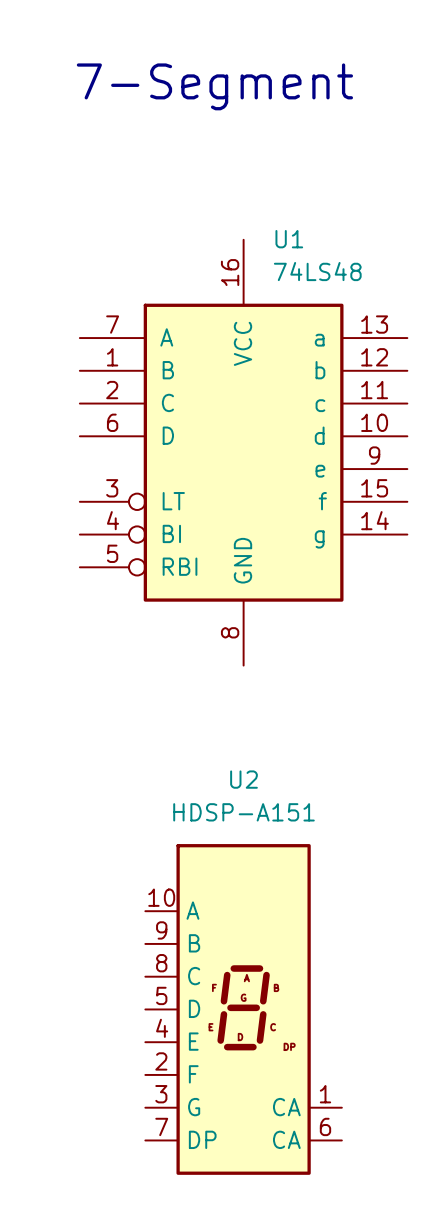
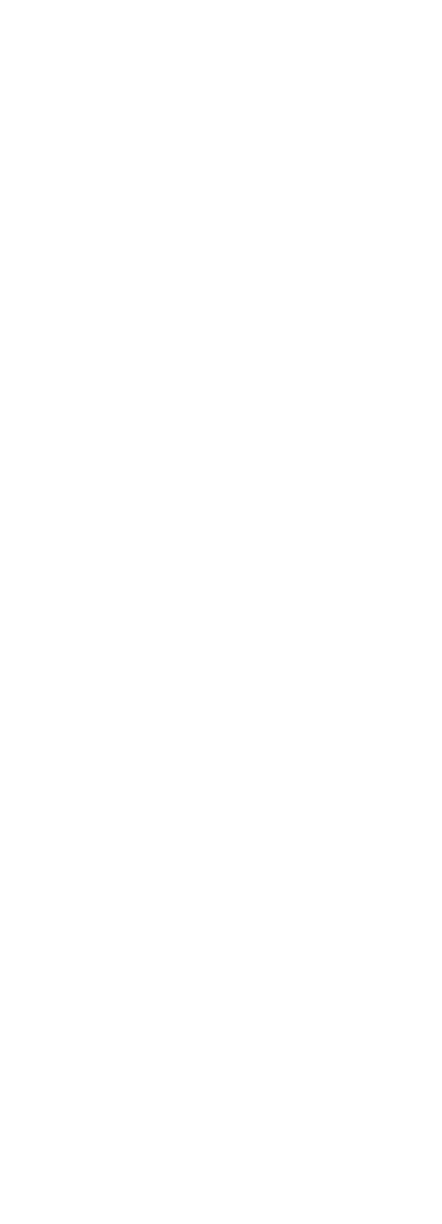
text: 7-Segment (214, 86) -> none
U1: 74LS48 (243, 452) -> none
U2: HDSP-A151 (243, 1009) -> none

